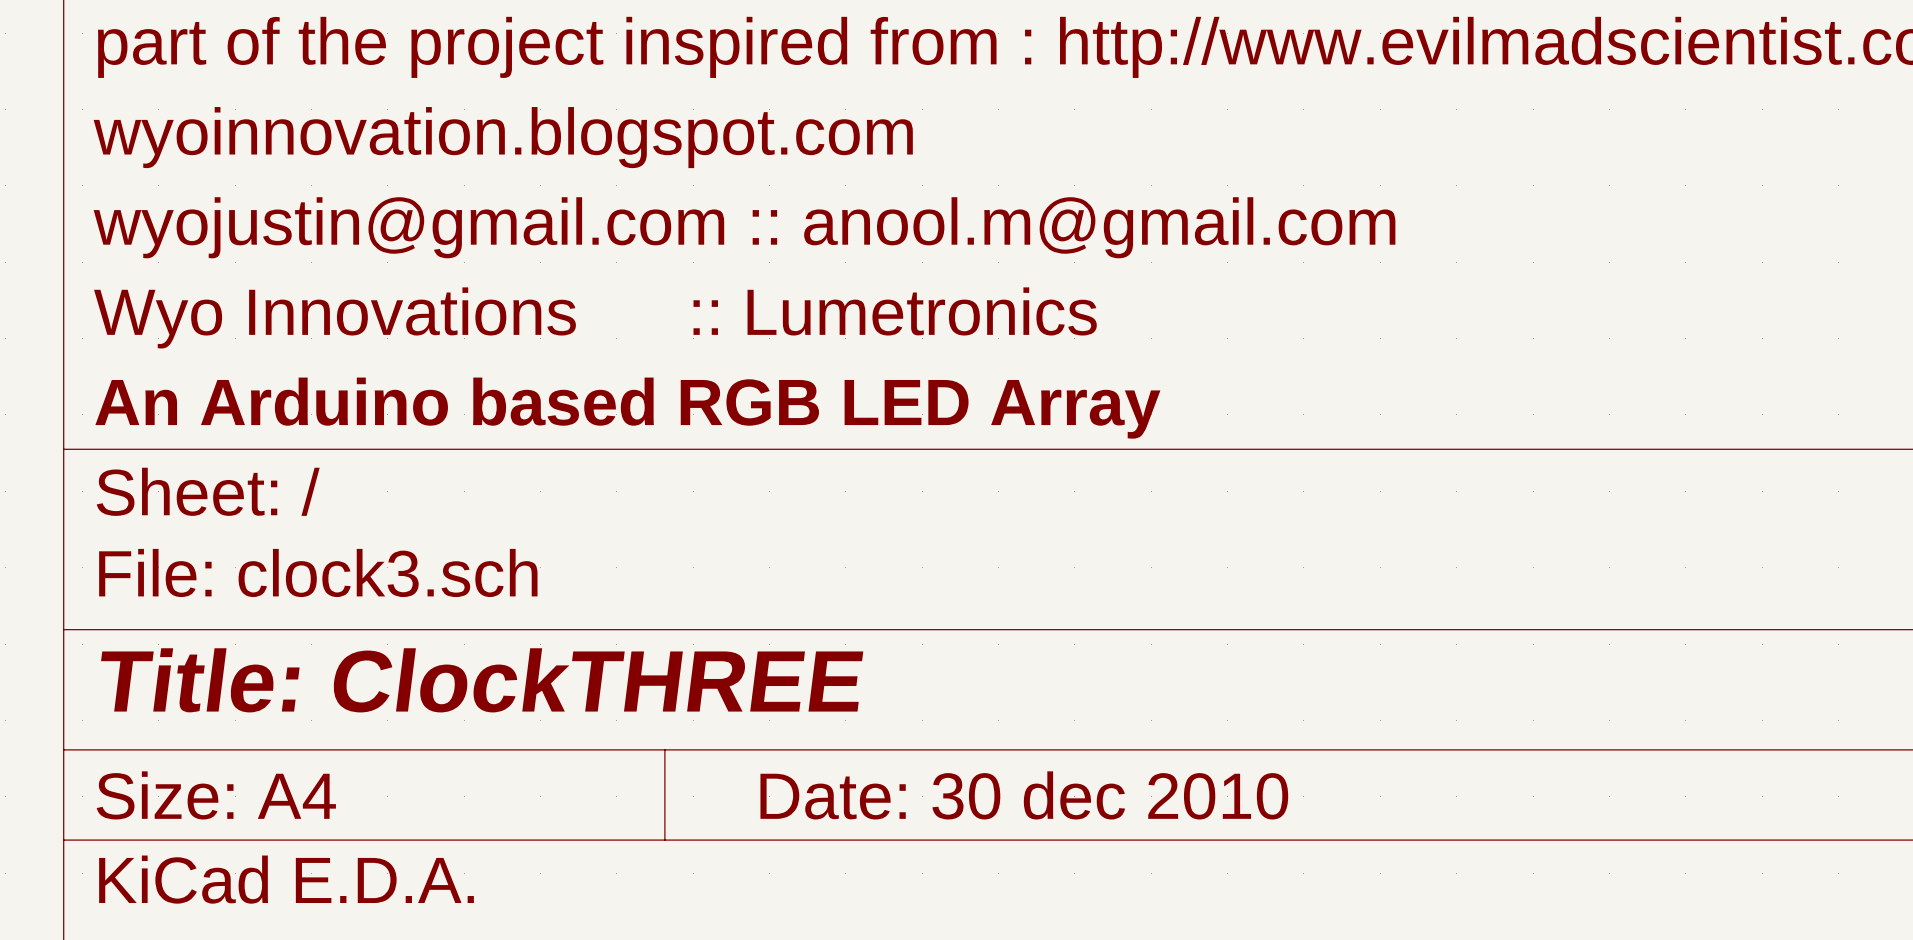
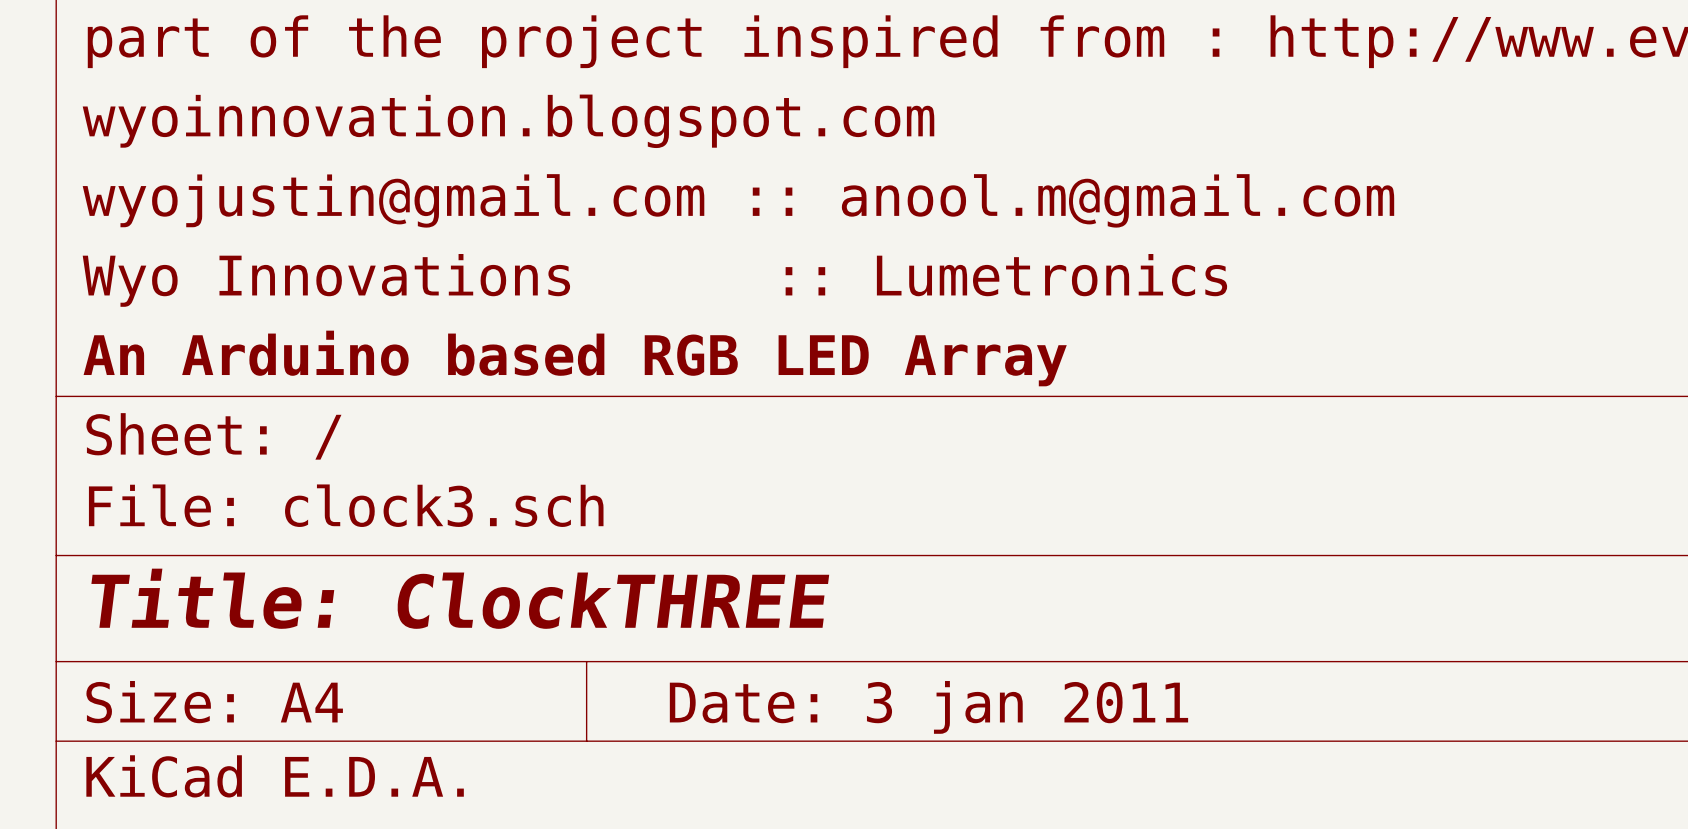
title block: Date: 30 dec 2010 (1024, 795) -> Date: 3 jan 2011 (928, 707)

